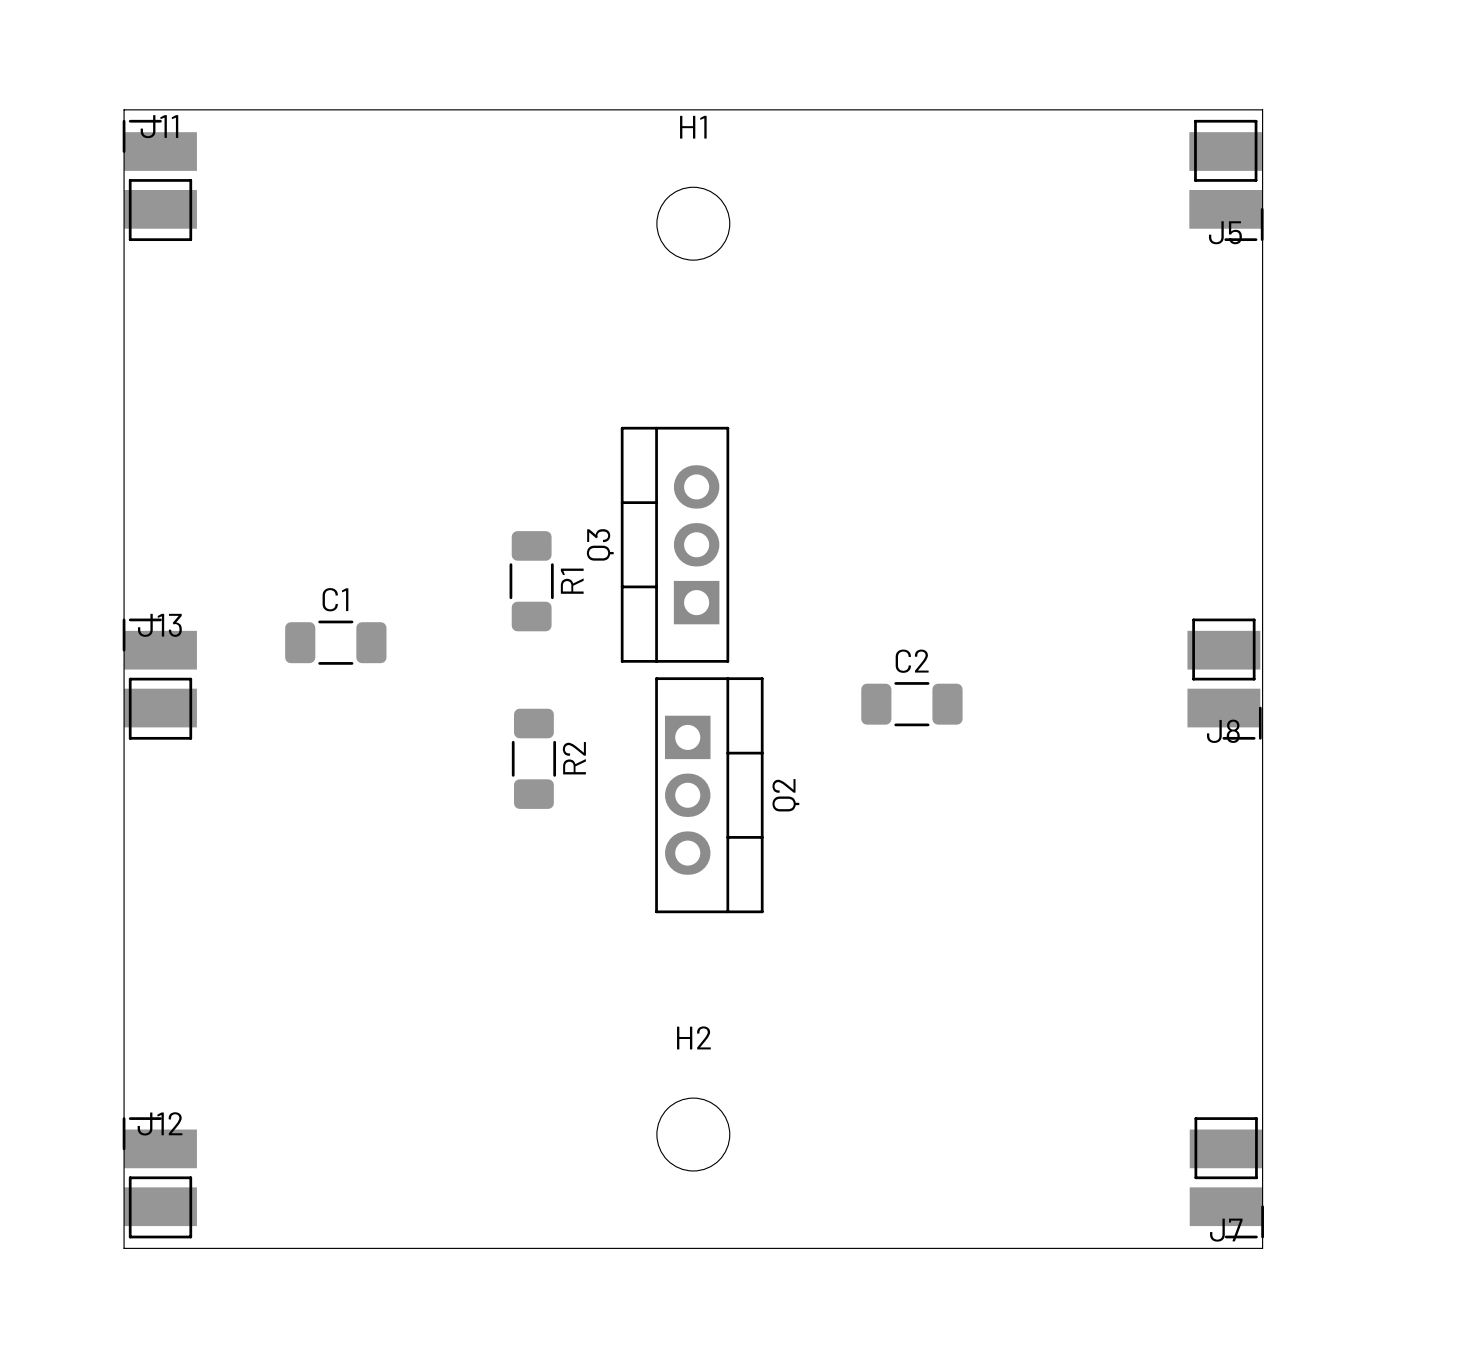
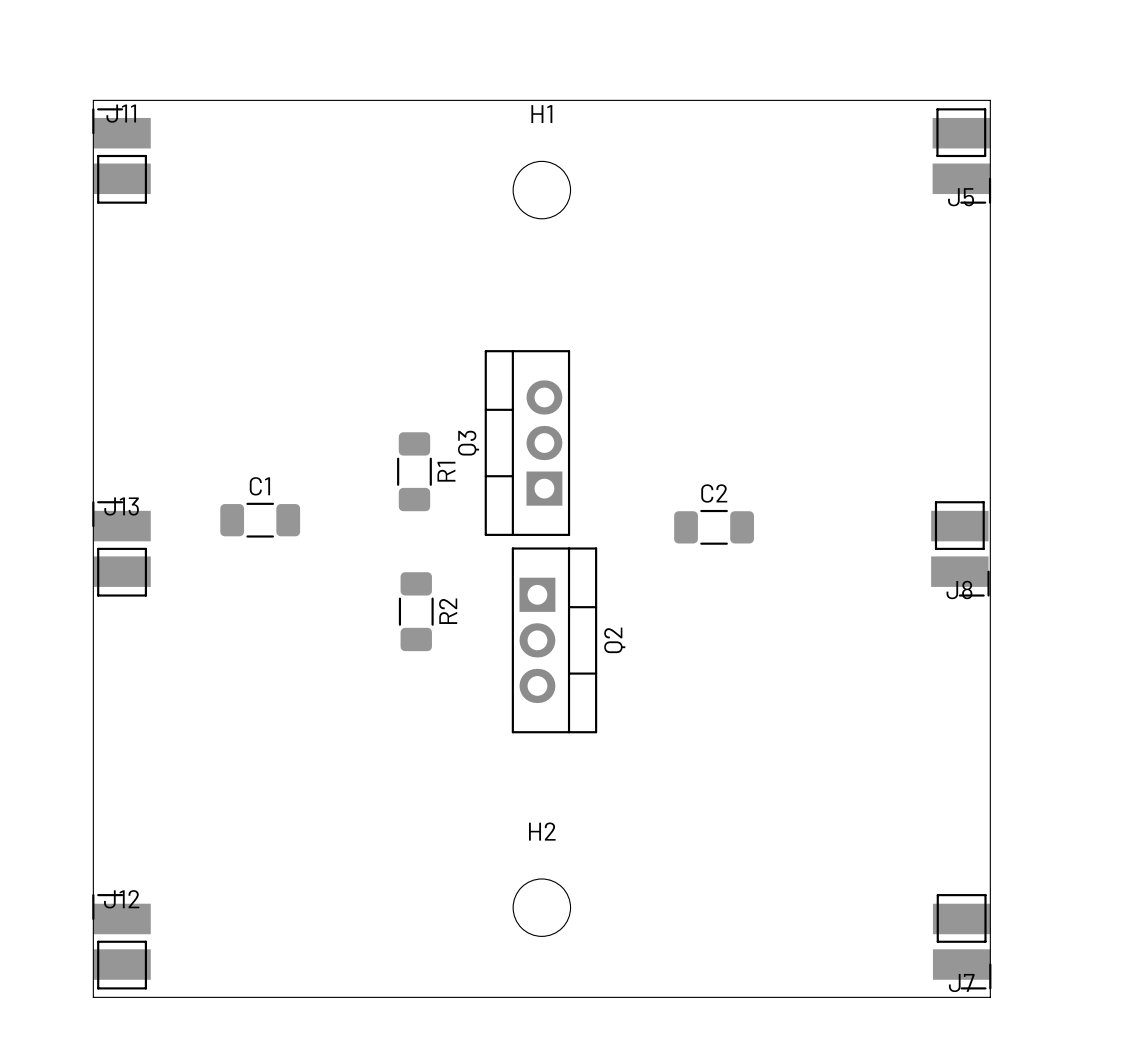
C2 position: (911, 704) -> (714, 527)

